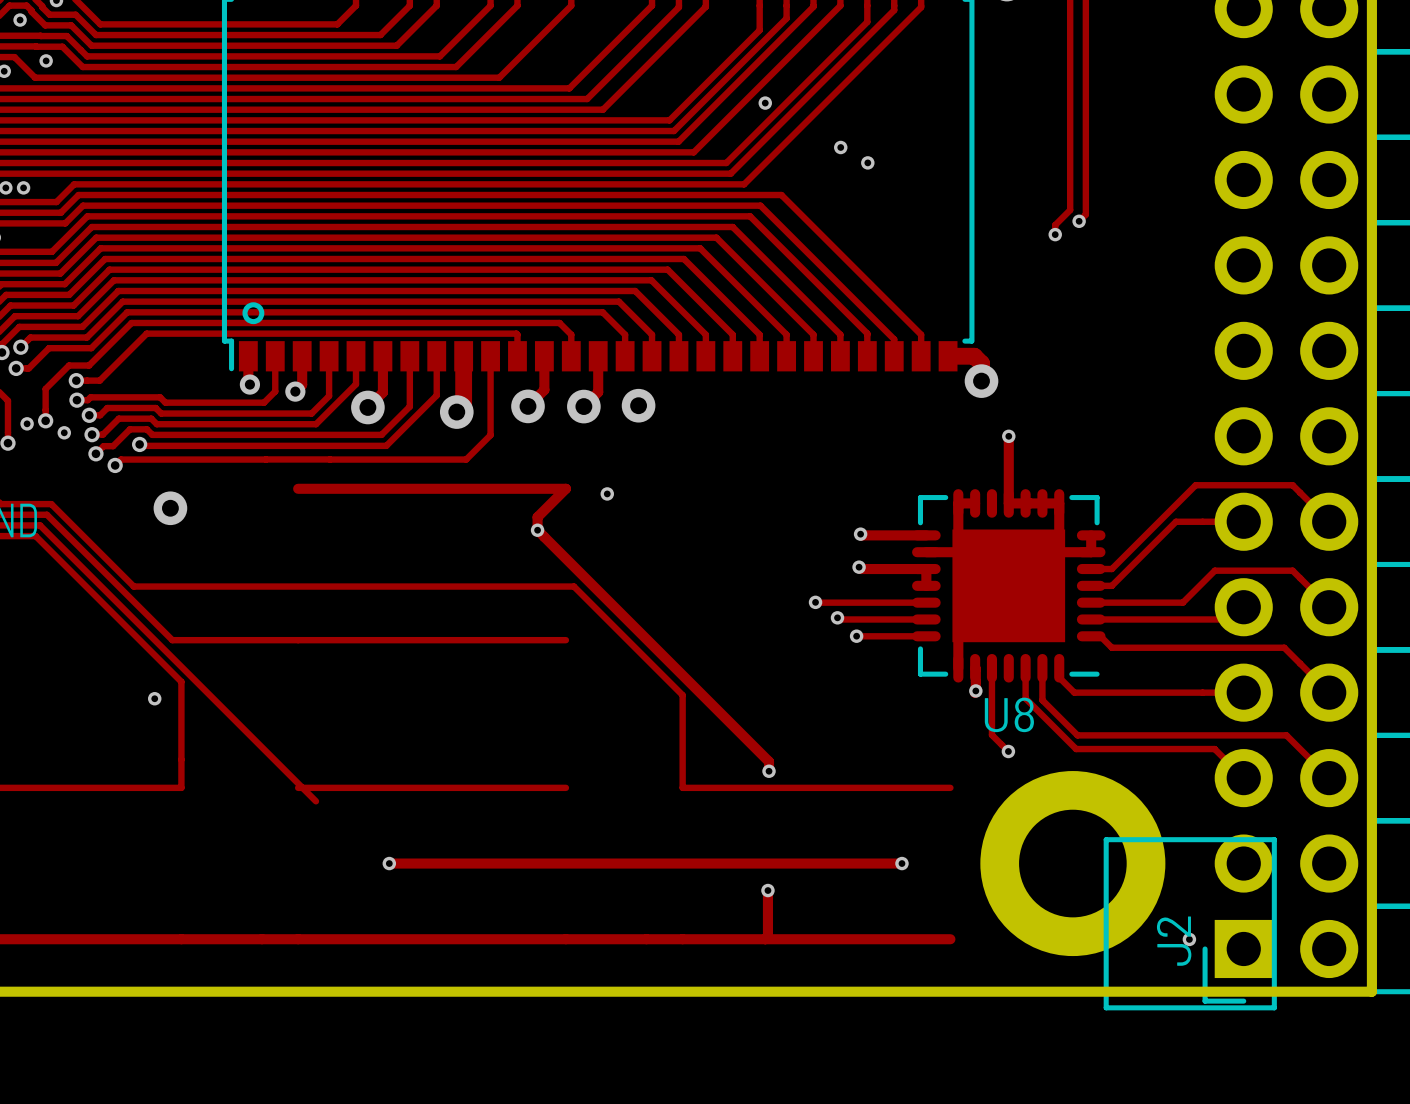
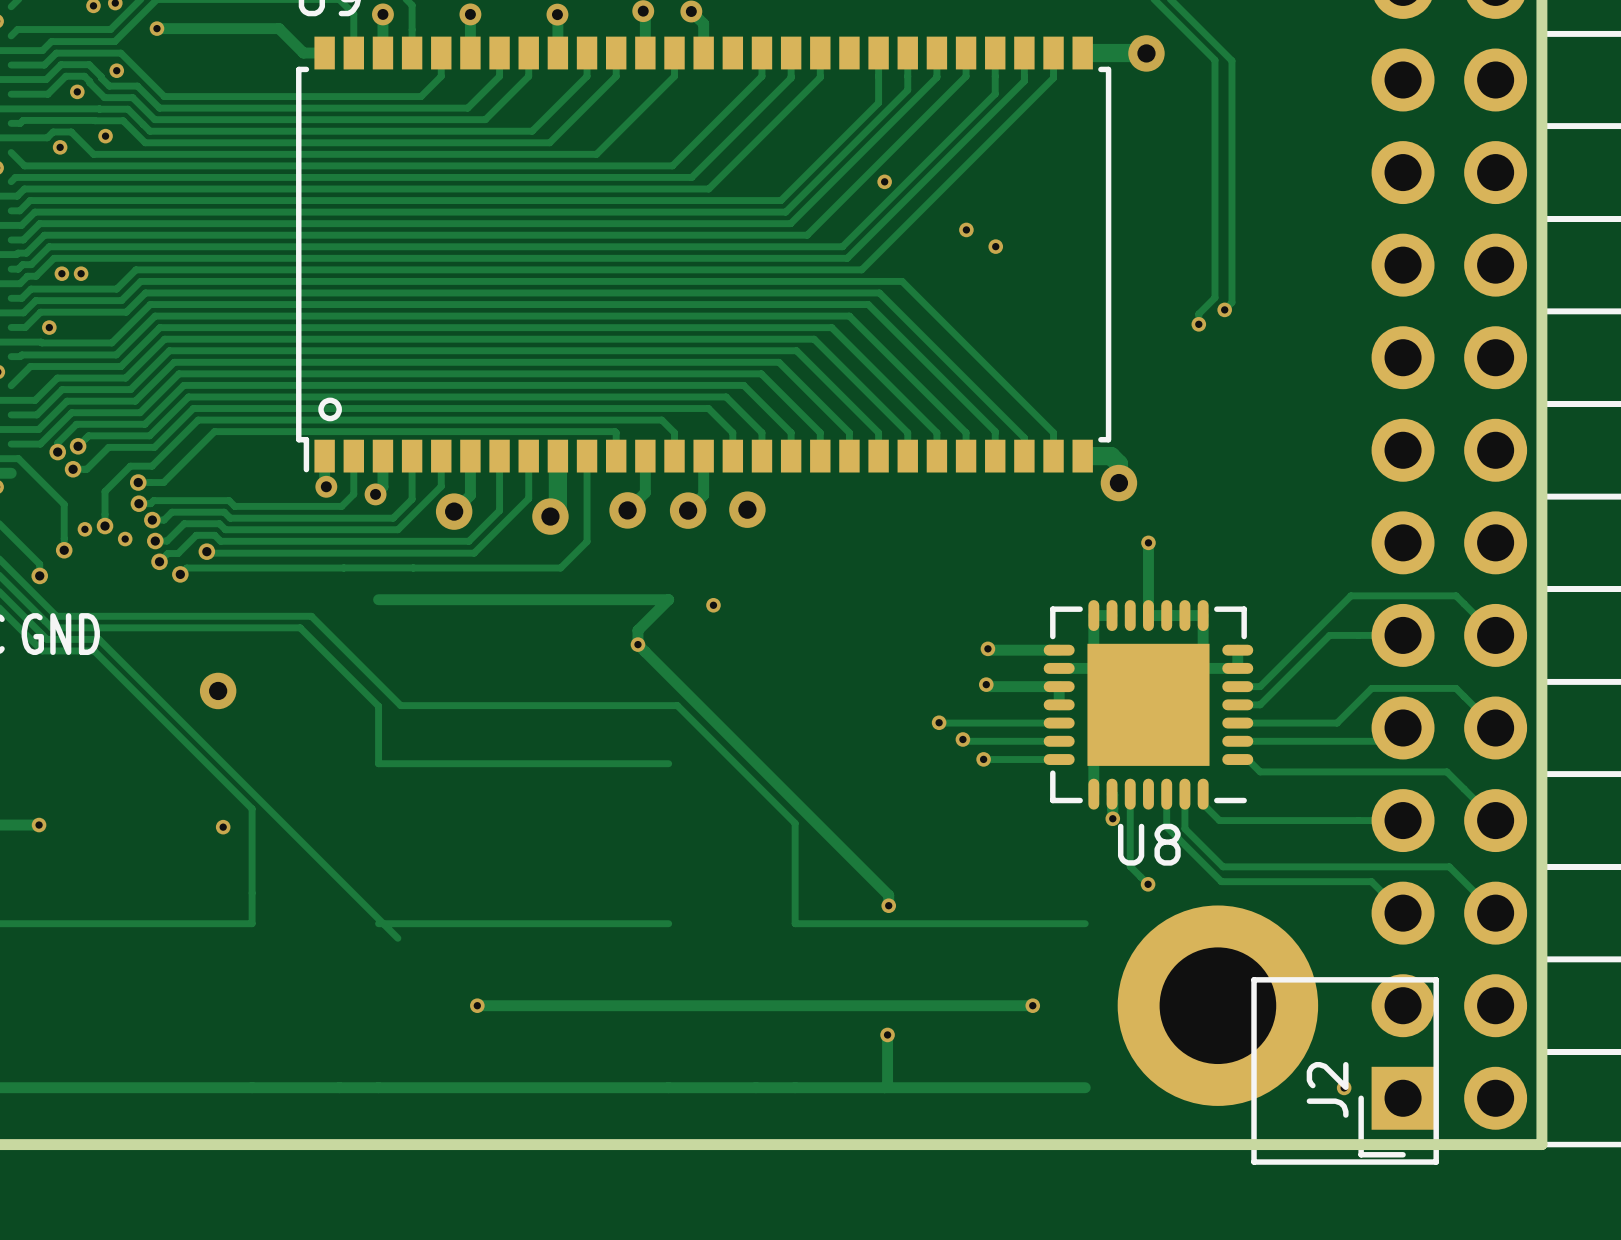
track: (51, 504) (133, 586) (318, 586) -> (111, 616) (311, 616) (400, 705)
via position: (170, 508) -> (218, 690)
track: (46, 514) (172, 640) (298, 640) -> (106, 627) (300, 627) (378, 706) (378, 763)

